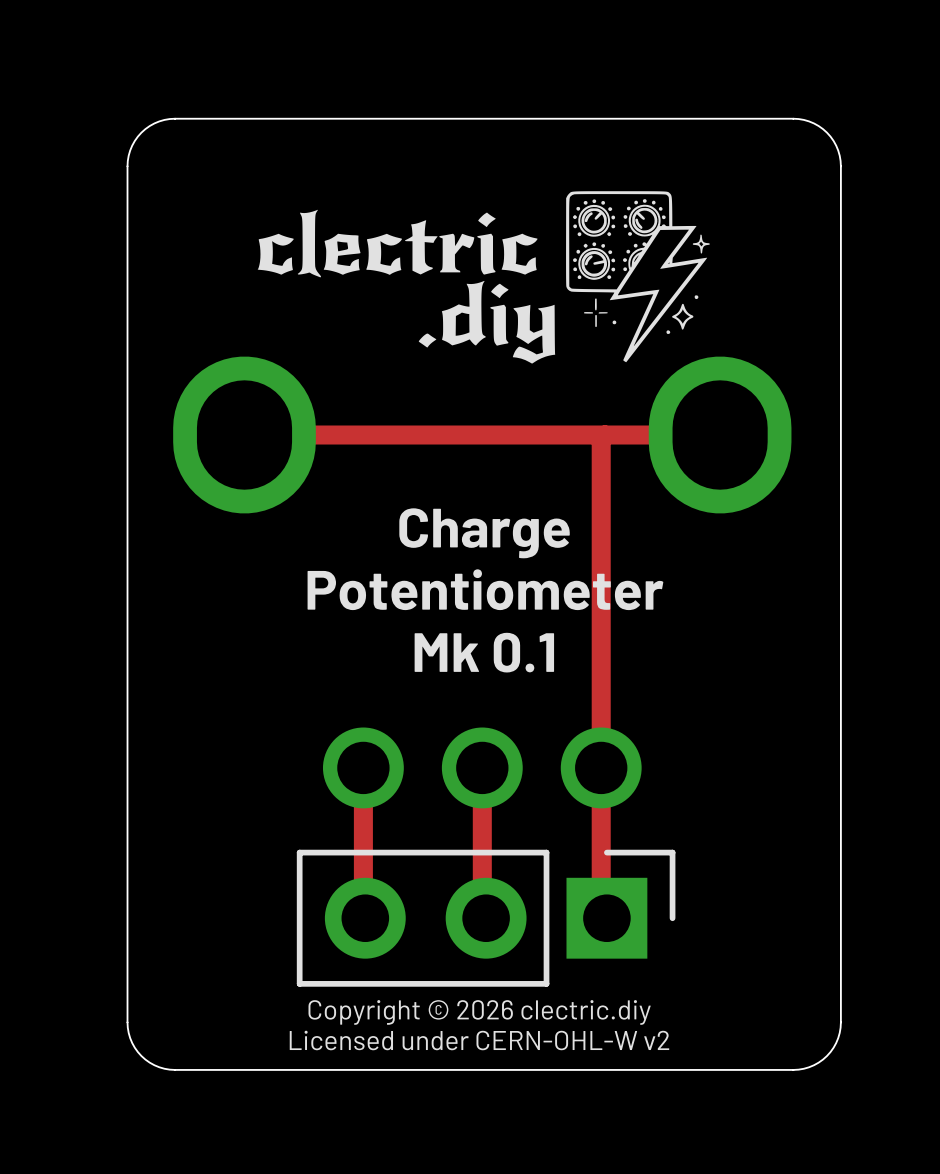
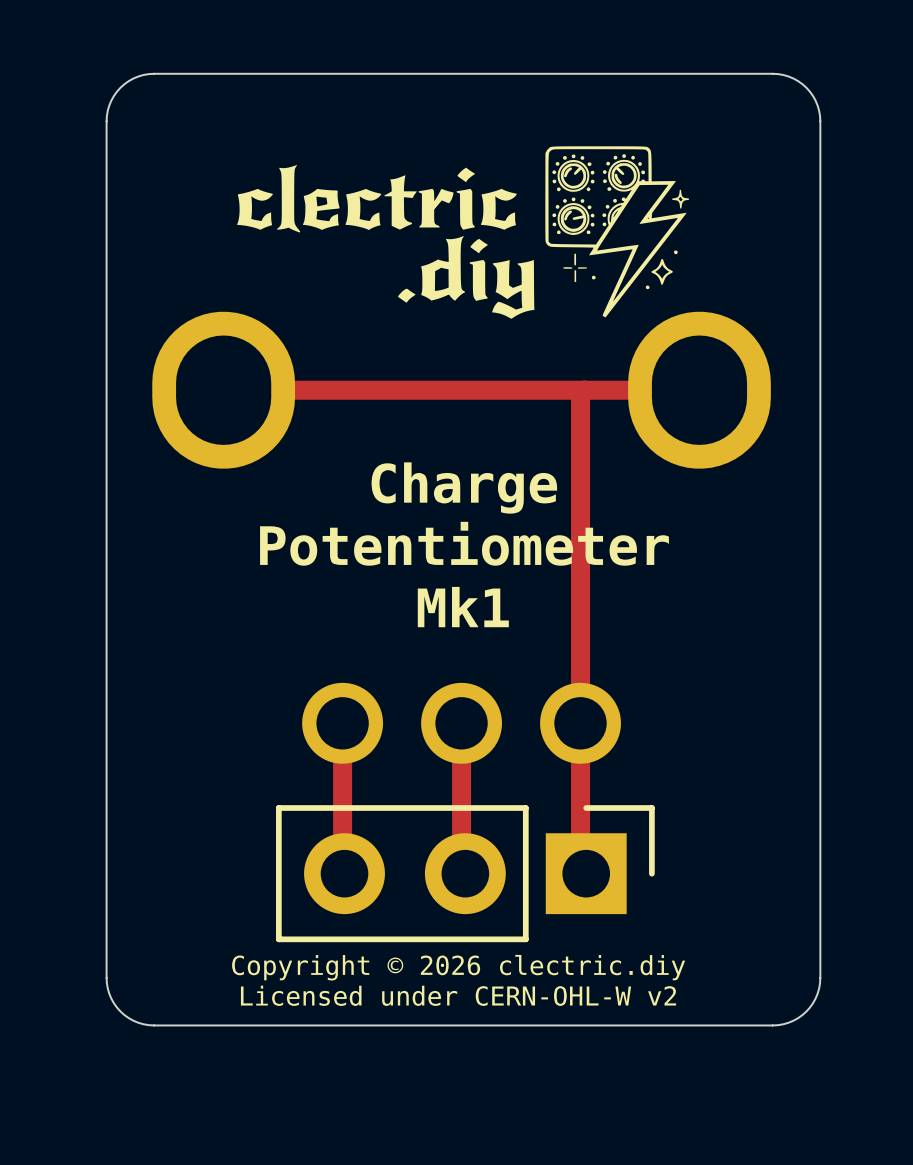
text: Mk 0.1 (484, 652) -> Mk1 (463, 607)

